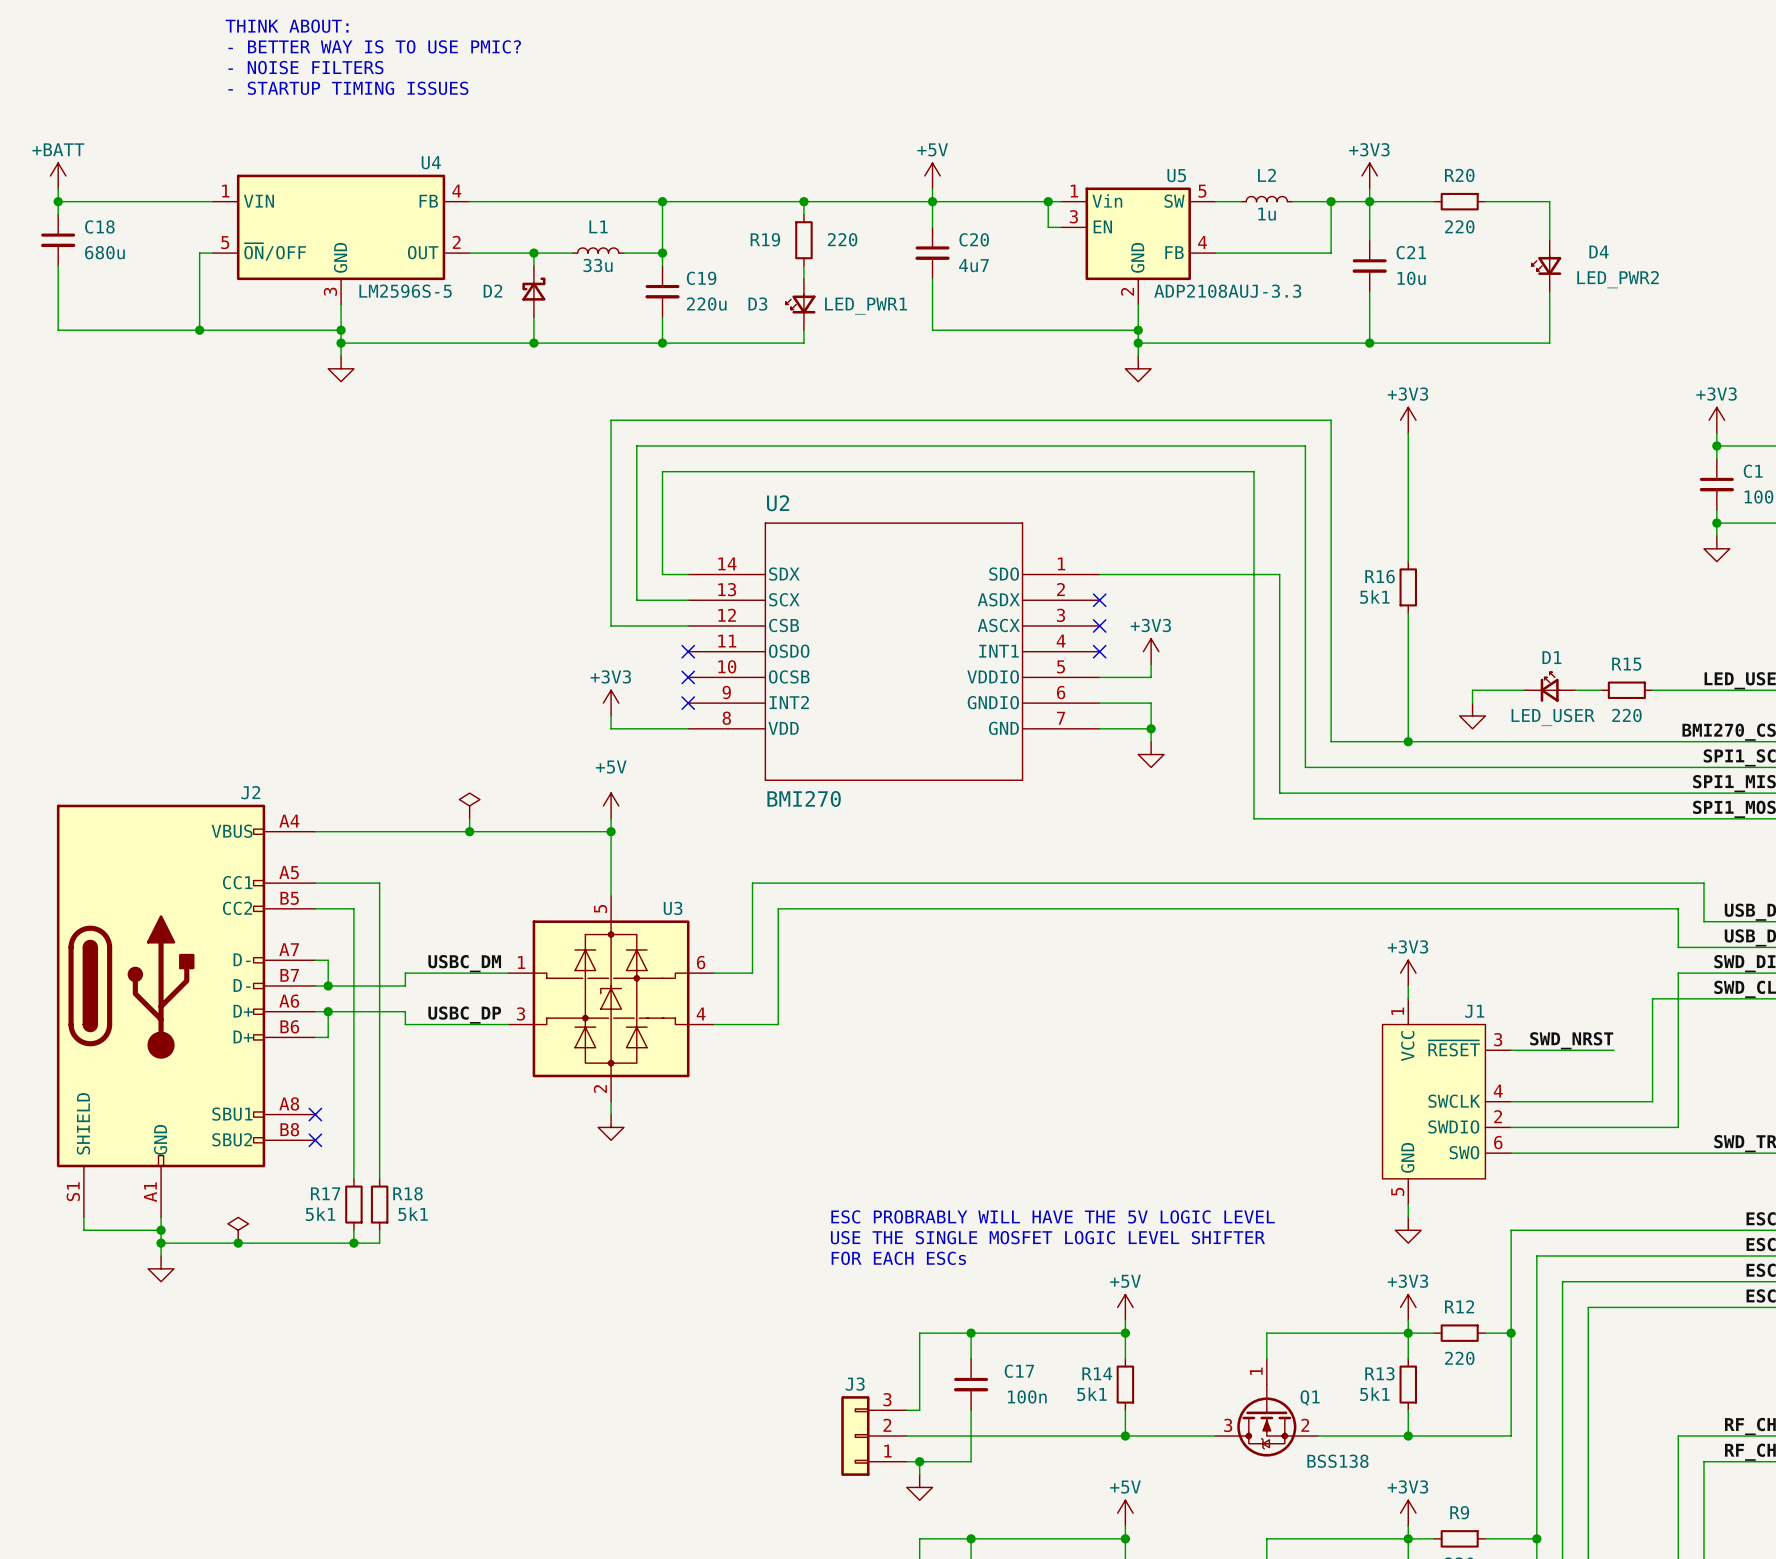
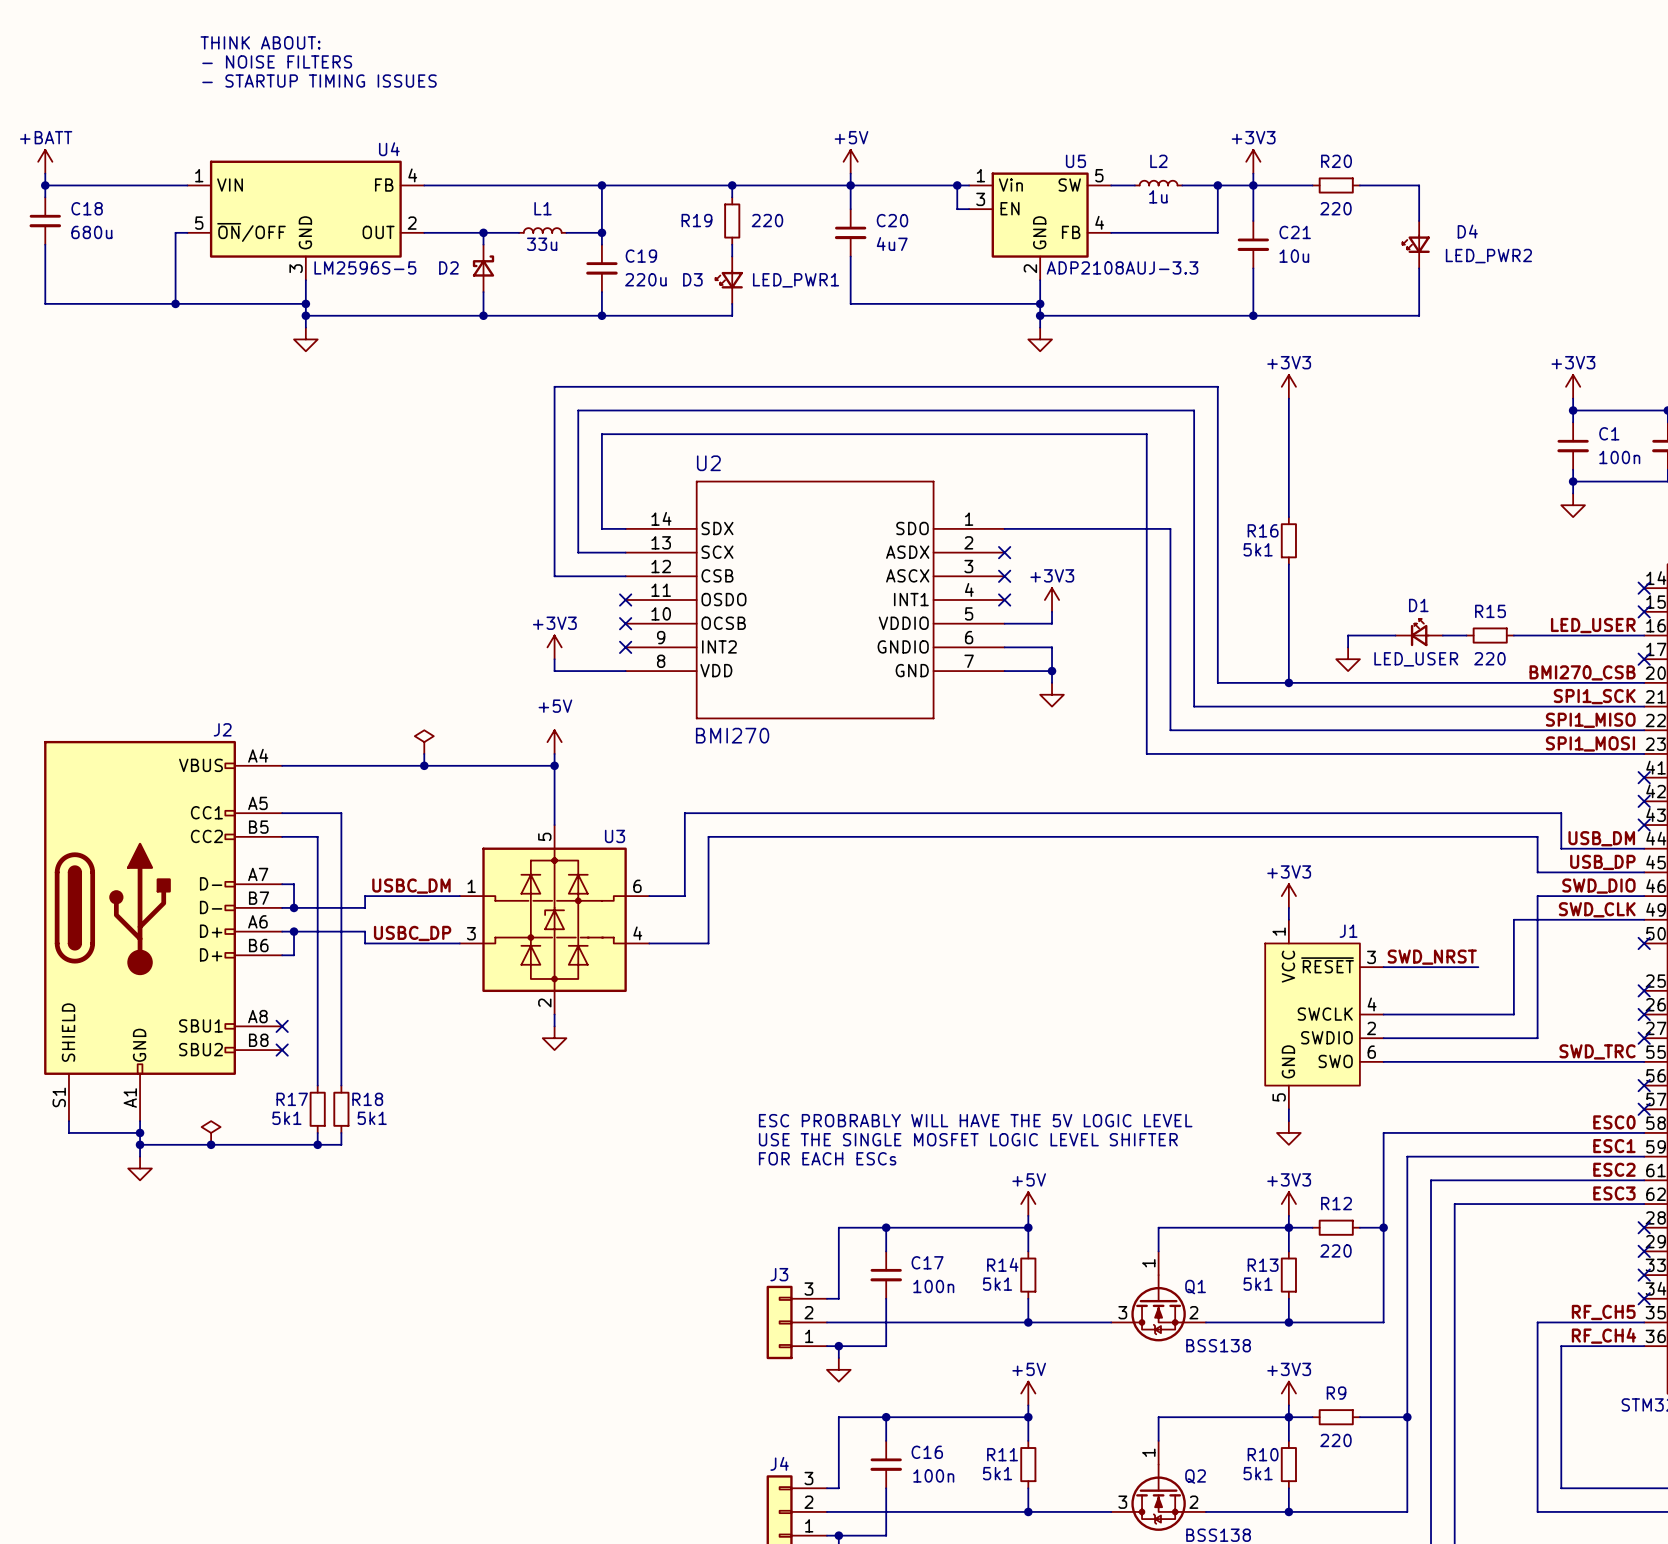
text: THINK ABOUT: (287, 26) -> none
text: - BETTER WAY IS TO USE PMIC? (374, 46) -> THINK ABOUT: (260, 42)

